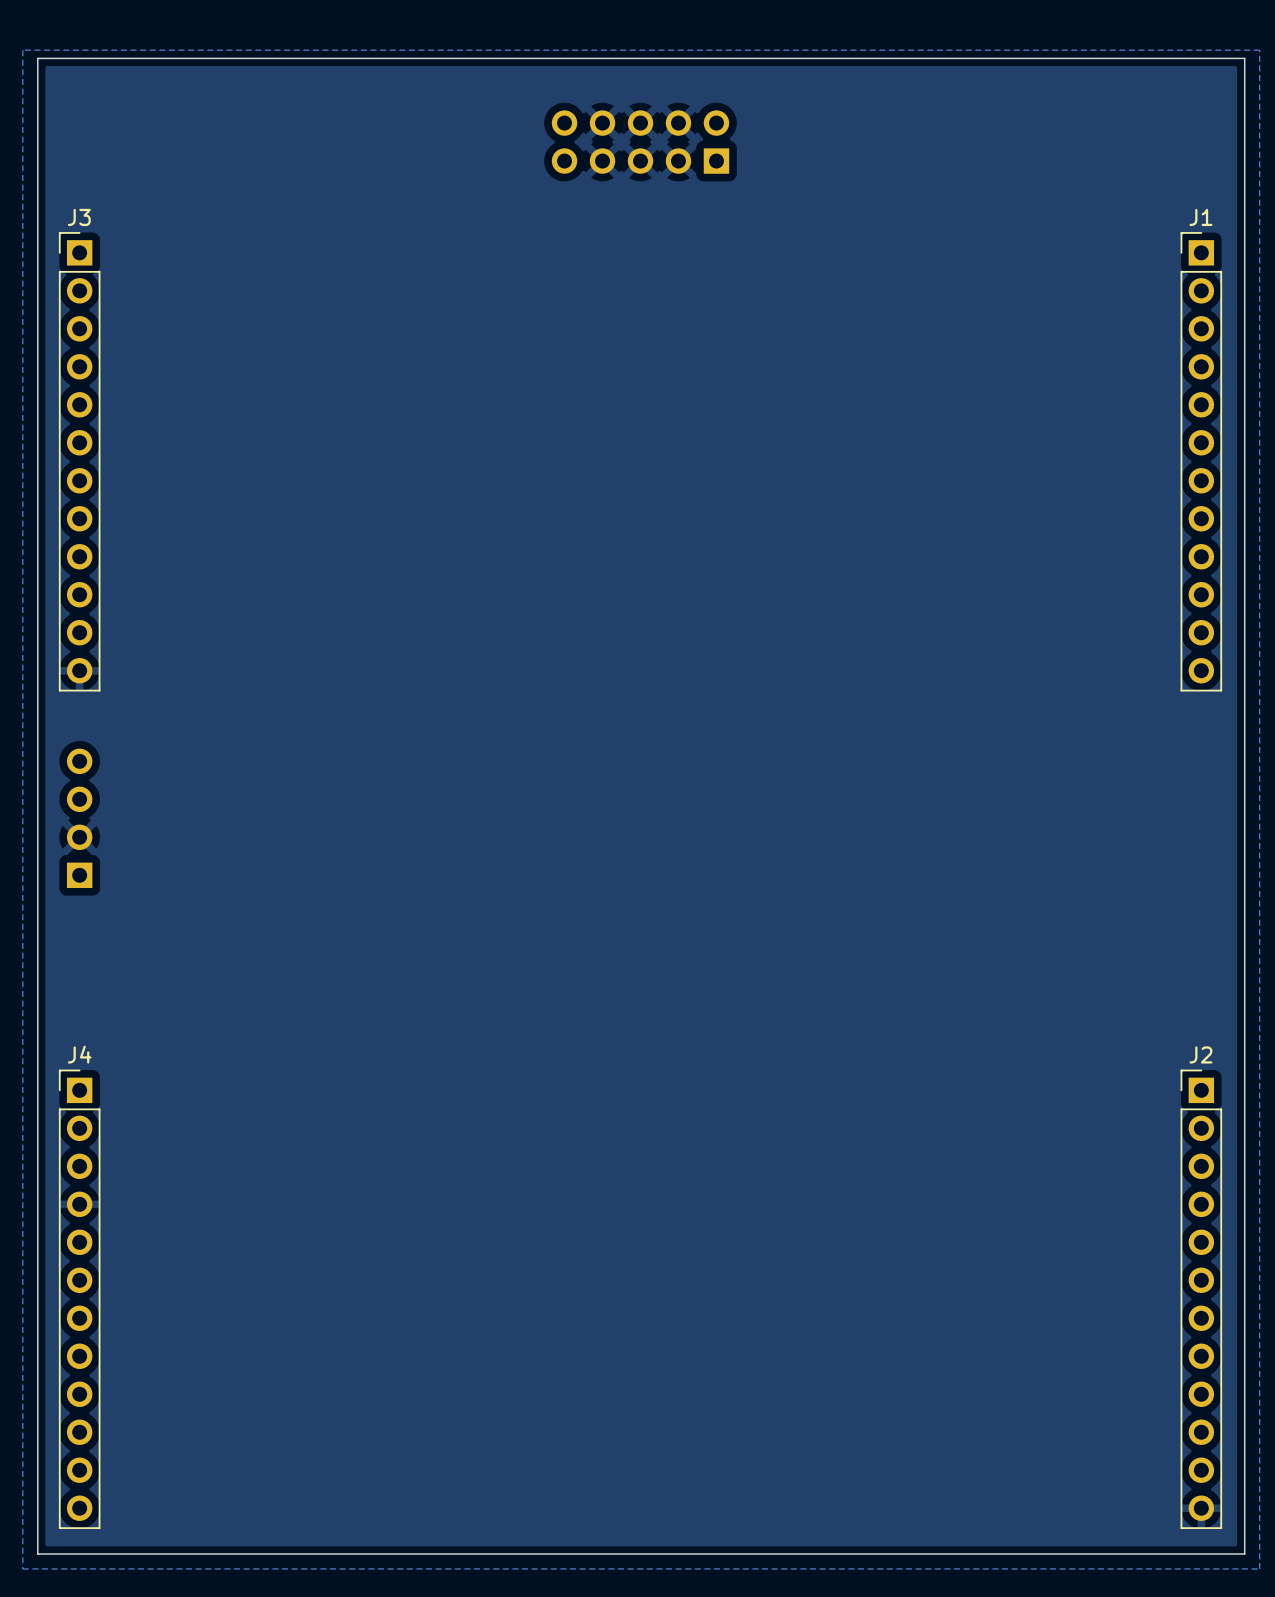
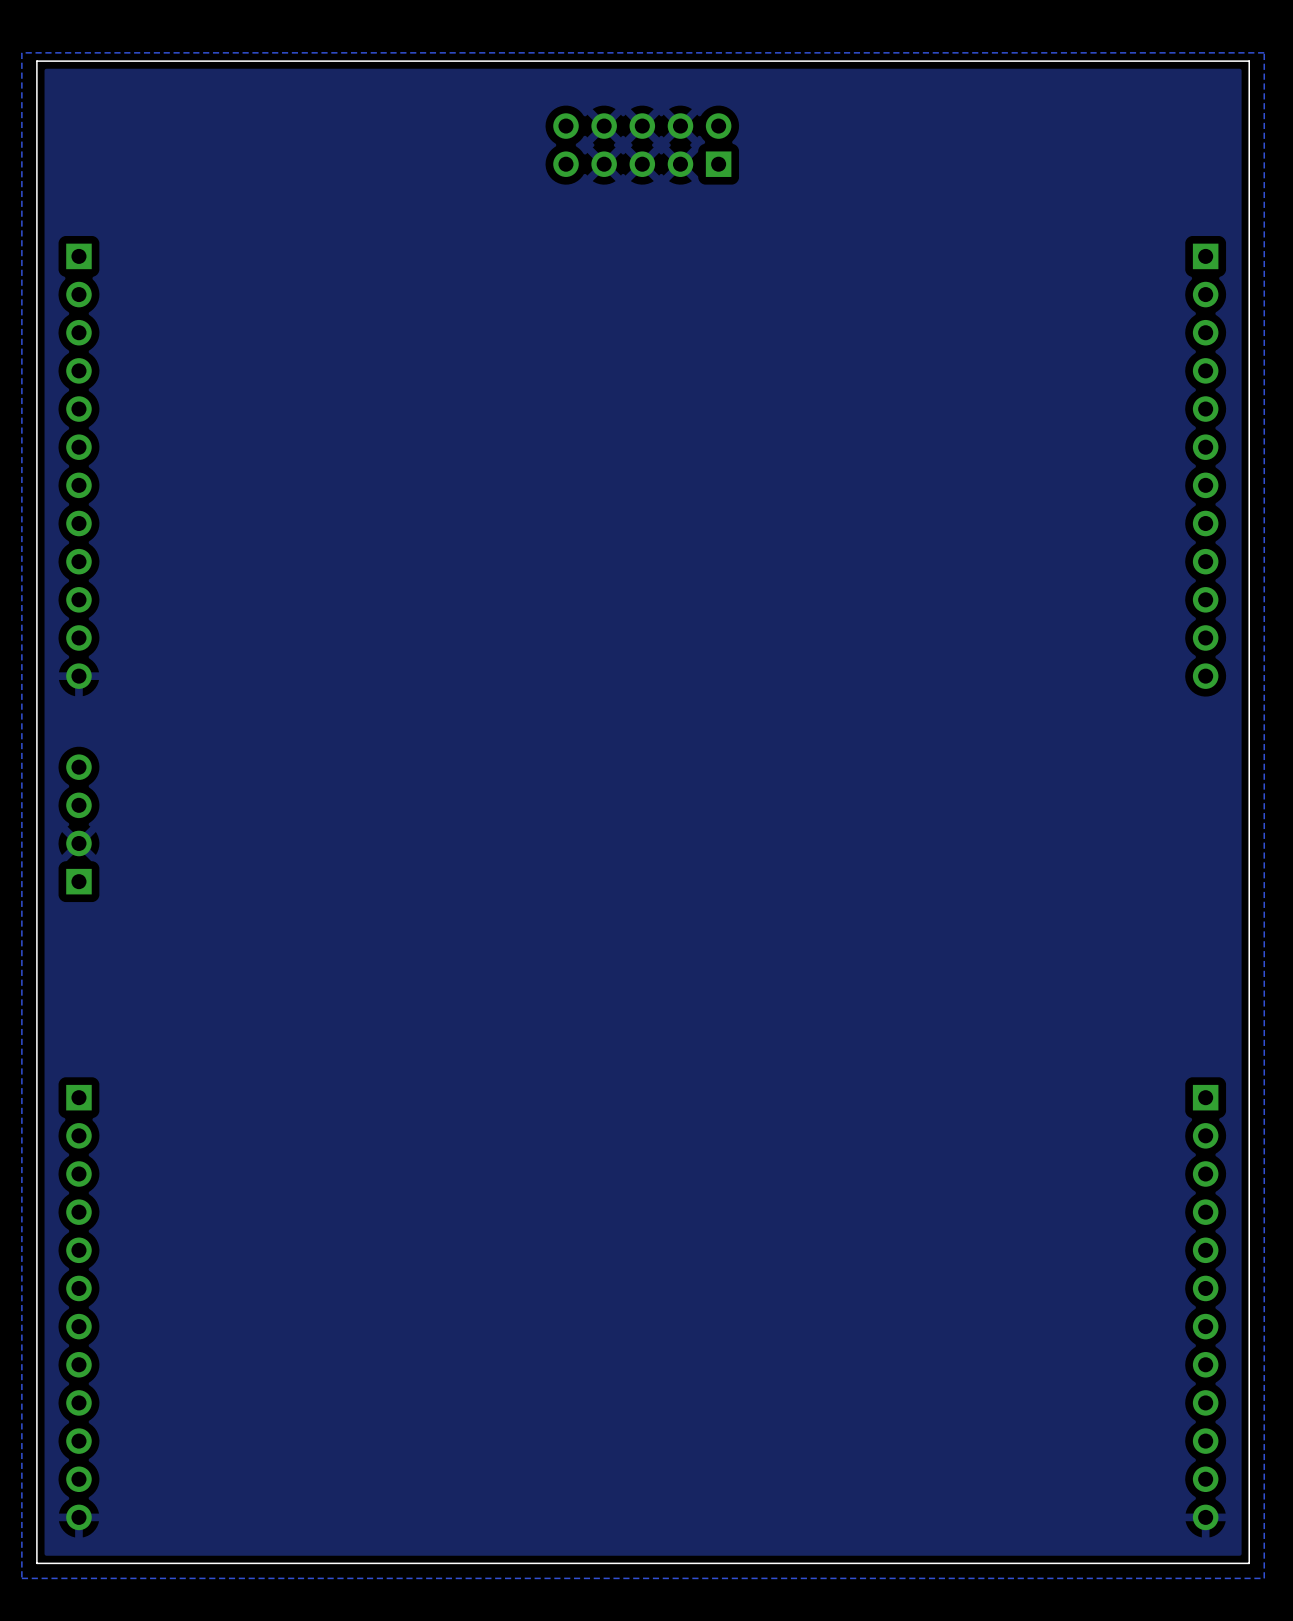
J3 side: bottom (79, 461) -> top (78, 466)
J1 side: bottom (1201, 461) -> top (1205, 466)
J4 side: bottom (79, 1299) -> top (78, 1307)
J2 side: bottom (1201, 1299) -> top (1205, 1307)

